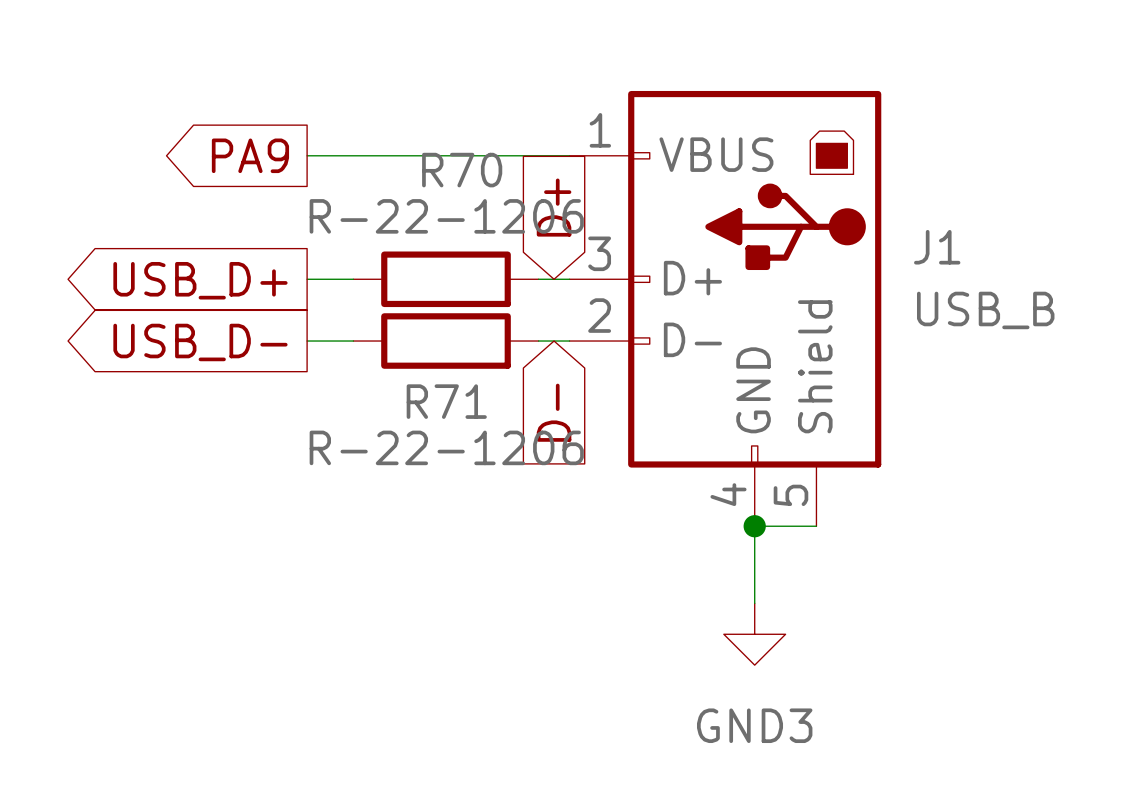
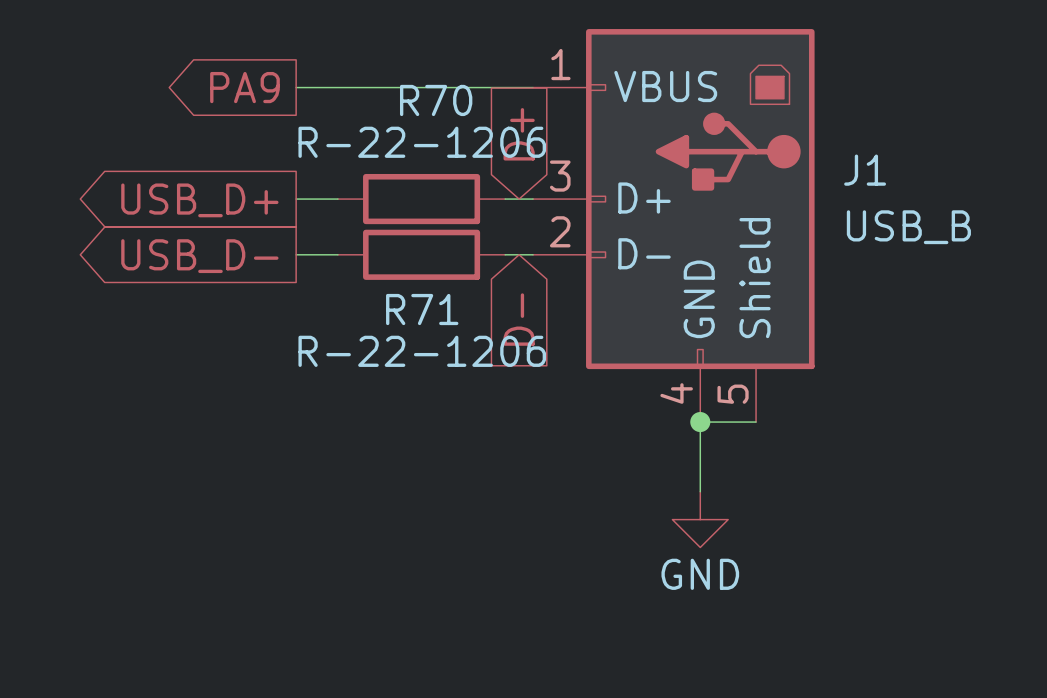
power symbol: GND3 (754, 634) -> GND (700, 519)

